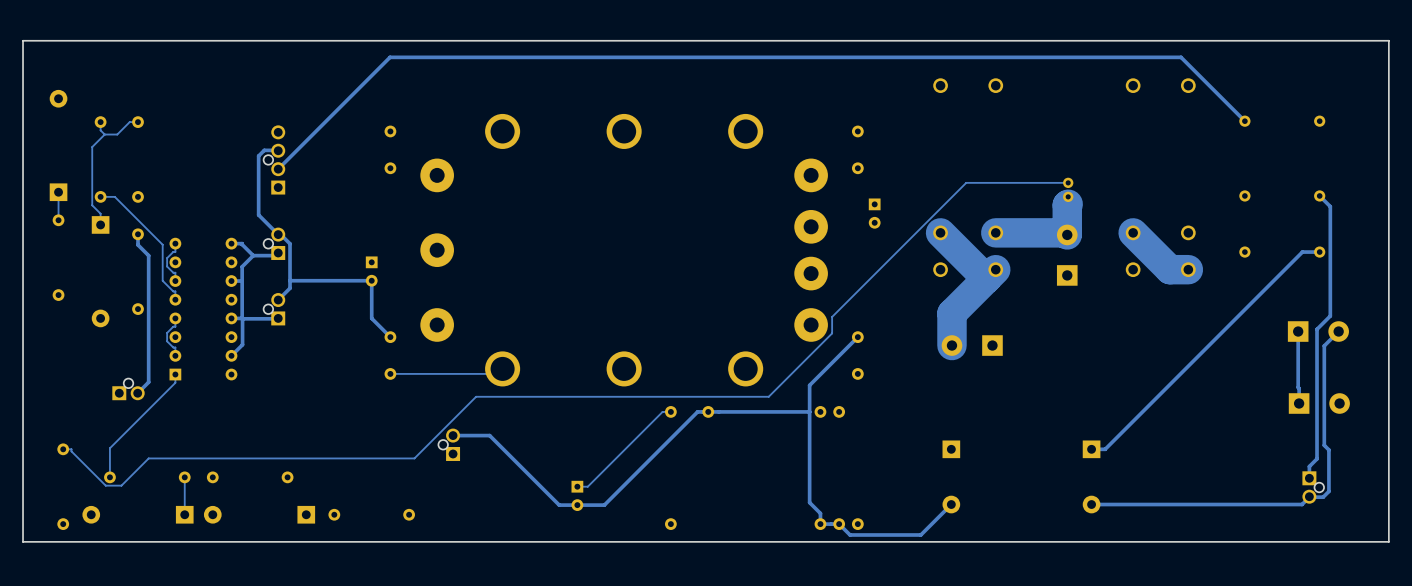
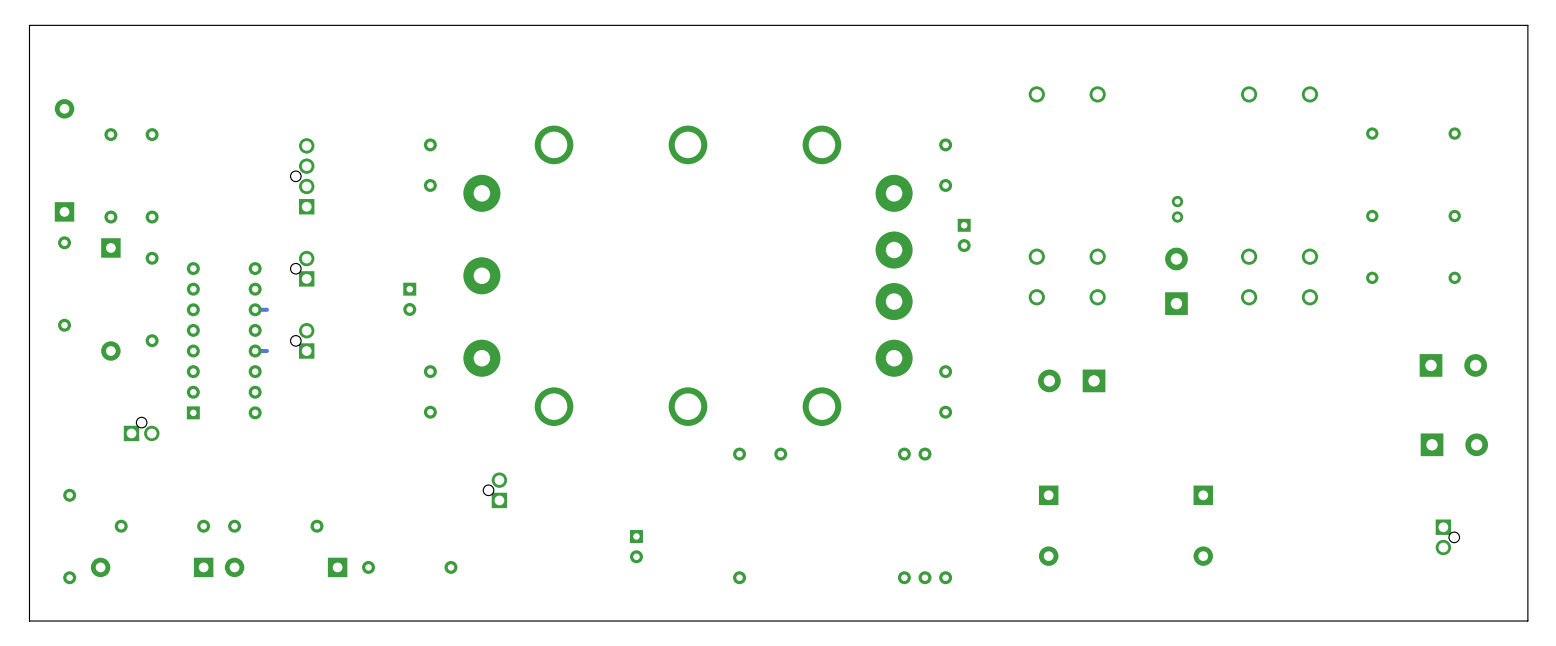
board edge: (1388, 40) (1388, 541) (23, 541) (23, 40) (1388, 40) -> (1527, 25) (1527, 621) (29, 621) (29, 25) (1527, 25)
track: (1244, 121) (1181, 57) (390, 57) (278, 169) -> none
track: (100, 122) (100, 130) (104, 134) -> none
track: (138, 122) (129, 122) (117, 134) (104, 134) -> none
track: (104, 134) (92, 147) (92, 205) (100, 213) (100, 224) -> none
track: (278, 150) (264, 150) (258, 156) (258, 215) (290, 243) (290, 288) (278, 300) -> none
track: (1068, 182) (966, 182) (832, 316) (832, 333) (768, 396) (476, 396) (414, 458) (148, 458) (121, 485) (105, 485) (71, 449) (63, 449) -> none
track: (58, 192) (58, 220) -> none
track: (1319, 195) (1330, 206) (1330, 316) (1317, 329) (1317, 458) (1309, 466) (1309, 478) -> none
track: (100, 196) (114, 196) (162, 244) (162, 280) (175, 291) (175, 299) -> none
track: (1068, 196) (1067, 234) -> none
track: (940, 232) (986, 278) -> none
track: (1067, 232) (995, 232) -> none
track: (1133, 232) (1169, 269) (1188, 269) -> none
track: (138, 234) (138, 244) (148, 255) (148, 382) (137, 393) -> none
track: (175, 243) (175, 251) (167, 258) (167, 266) (175, 272) (175, 281) -> none
track: (231, 243) (242, 243) (253, 255) -> none
track: (278, 252) (275, 255) (253, 255) -> none
track: (1319, 252) (1302, 252) (1105, 449) (1091, 449) -> none
track: (253, 255) (242, 266) (242, 318) -> none
track: (995, 269) (951, 313) (951, 345) -> none
track: (290, 280) (371, 280) (371, 318) (390, 337) -> none
track: (175, 318) (175, 326) (167, 332) (167, 341) (175, 347) (175, 355) -> none
track: (242, 318) (242, 344) (231, 355) -> none
track: (278, 318) (242, 318) -> none
track: (1298, 331) (1299, 403) -> none
track: (1338, 331) (1324, 345) (1324, 445) (1328, 449) (1328, 491) (1323, 497) (1309, 497) -> none
track: (857, 337) (809, 385) (809, 502) (820, 513) (820, 524) (839, 524) (850, 534) (920, 534) (951, 504) -> none
track: (502, 368) (497, 373) (390, 373) -> none
track: (175, 374) (175, 382) (109, 448) (109, 477) -> none
track: (670, 411) (662, 411) (587, 486) (577, 486) -> none
track: (809, 411) (697, 411) (604, 505) (559, 505) (489, 435) (453, 435) -> none
track: (184, 477) (184, 514) -> none
track: (1309, 497) (1302, 504) (1091, 504) -> none

